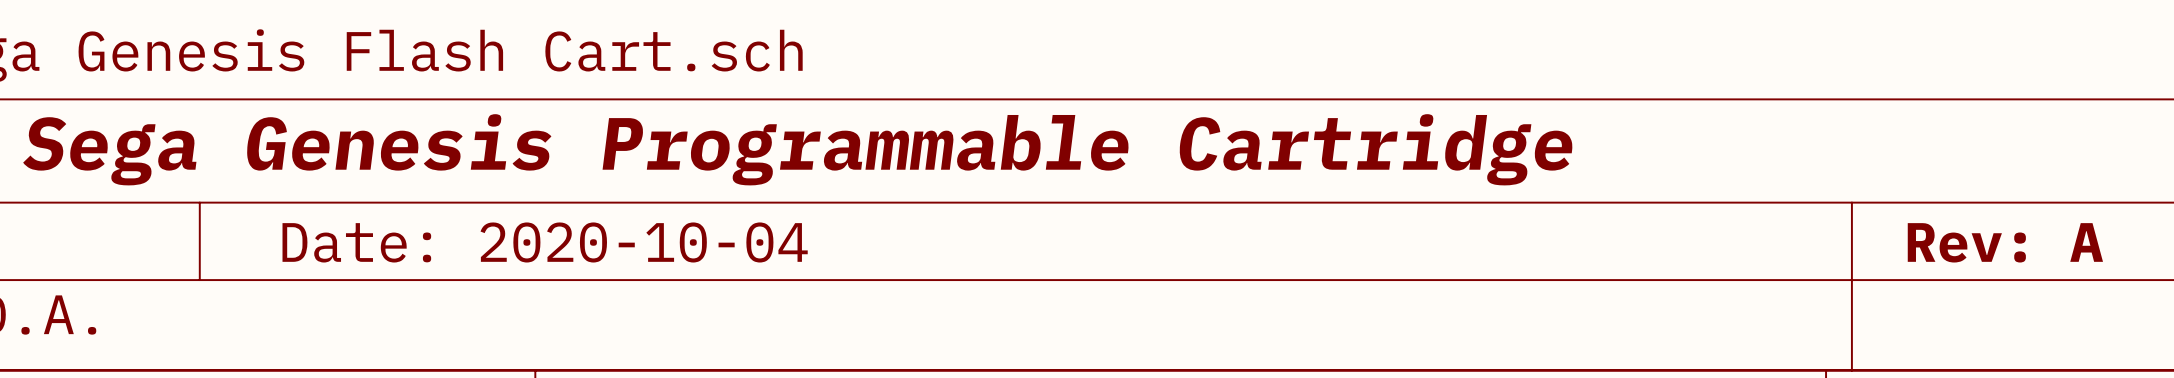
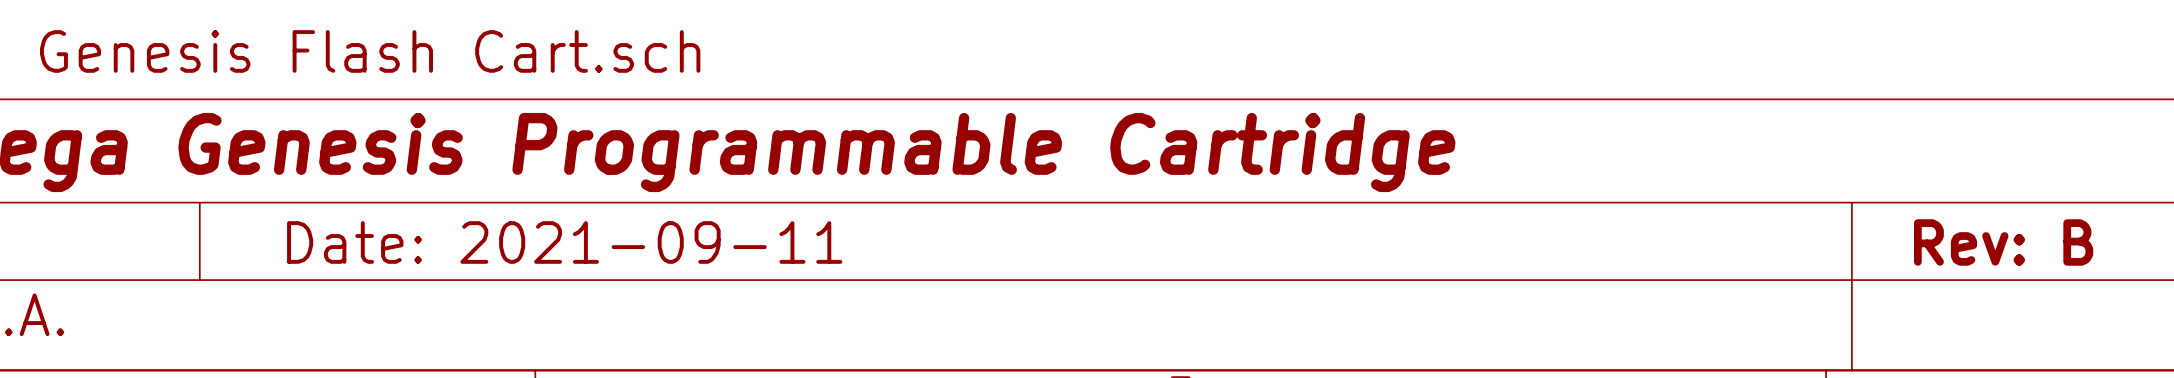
title block: Date: 2020-10-04 (545, 242) -> Date: 2021-09-11 (564, 242)
title block: Rev: A (2005, 242) -> Rev: B (2003, 242)

